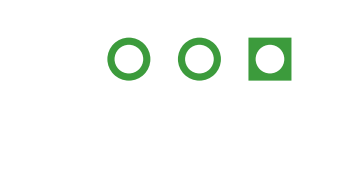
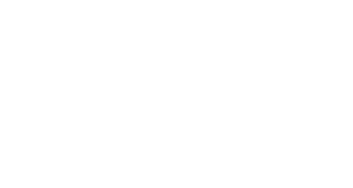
part: (199, 59) -> none

